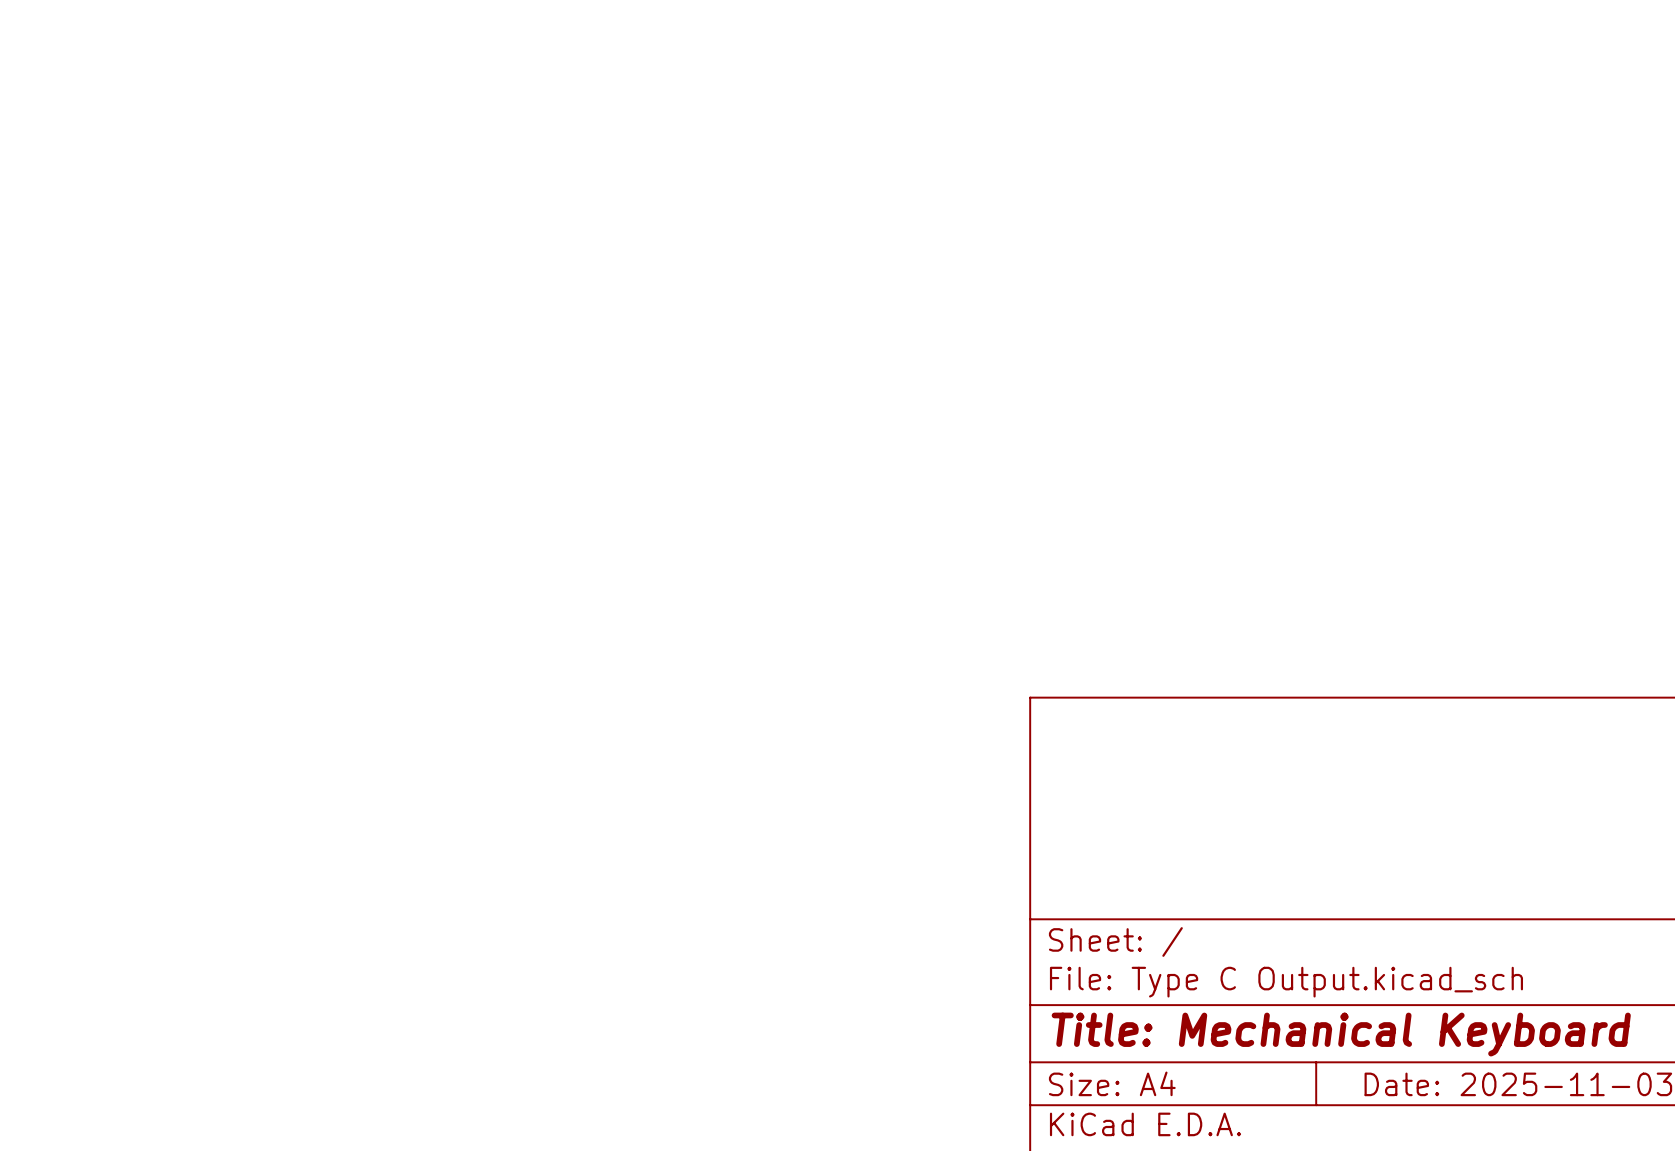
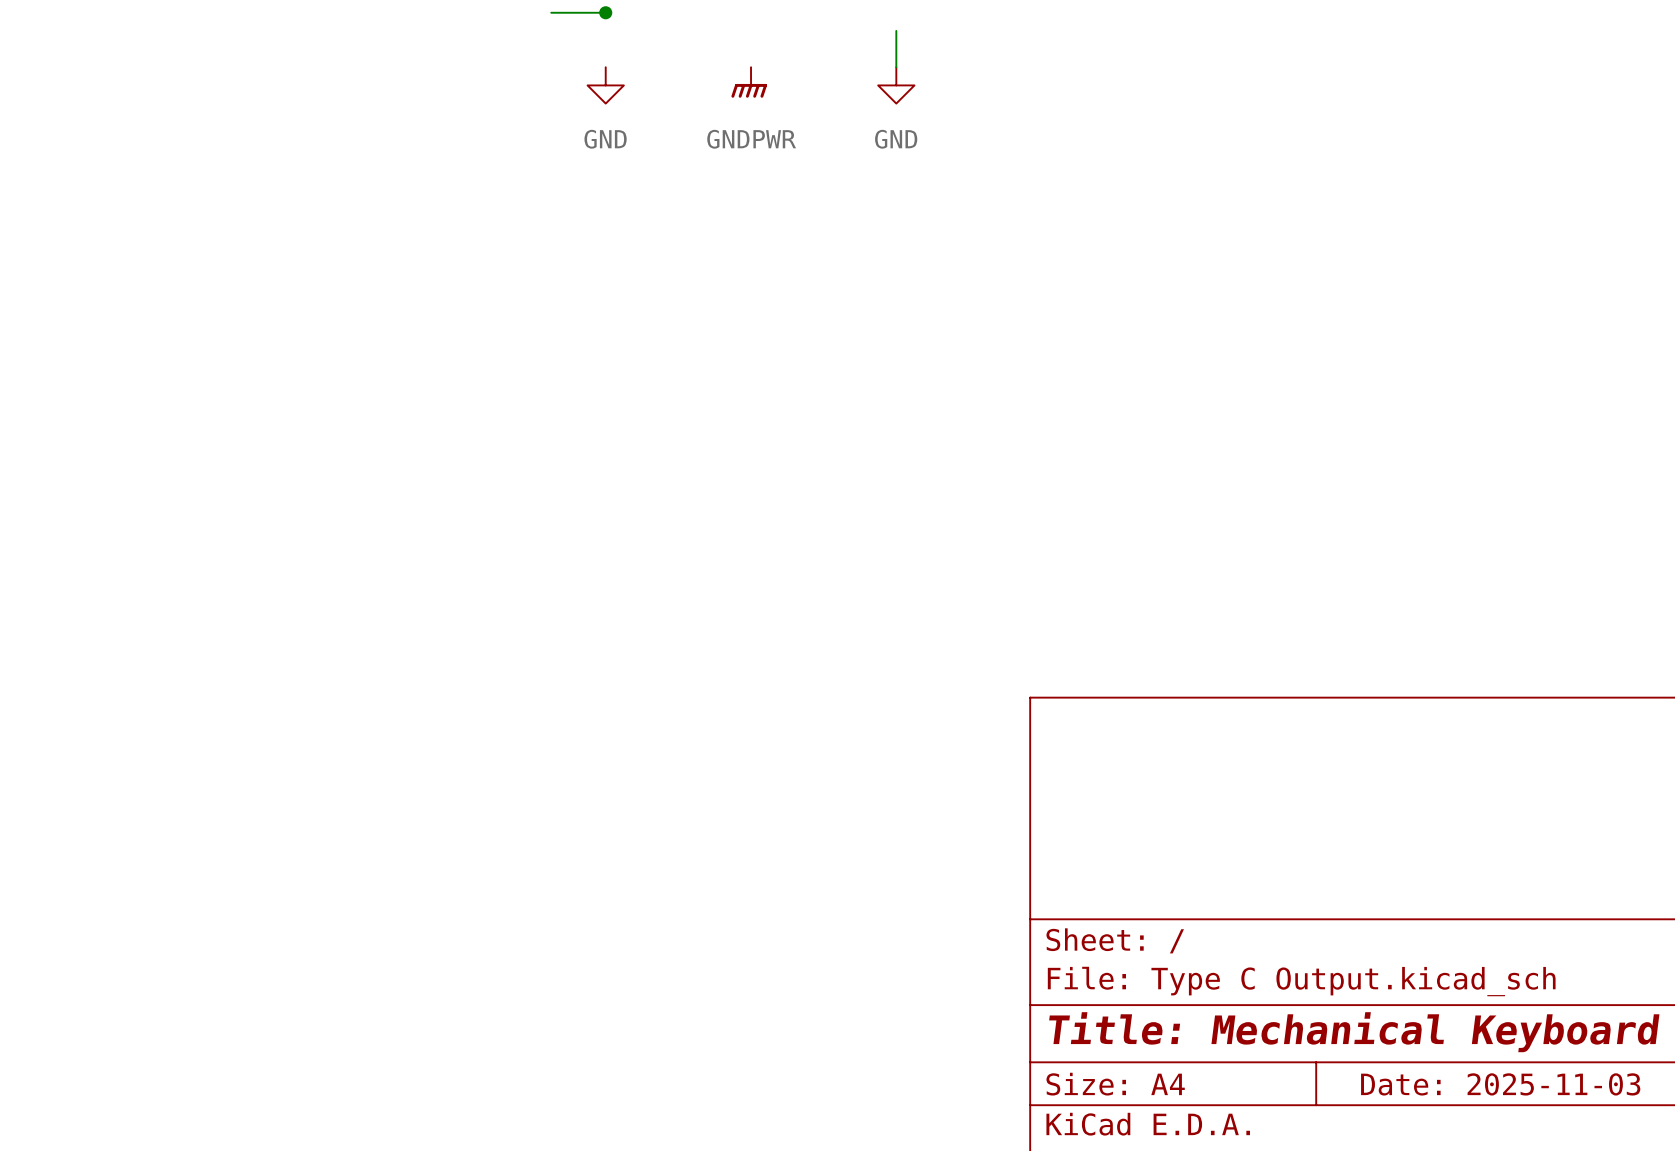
wire: none -> (551, 12) (605, 12)
junction: none -> (605, 12)
wire: none -> (896, 30) (896, 67)
power symbol: none -> GNDPWR (749, 82)
power symbol: none -> GND (605, 85)
power symbol: none -> GND (896, 85)

